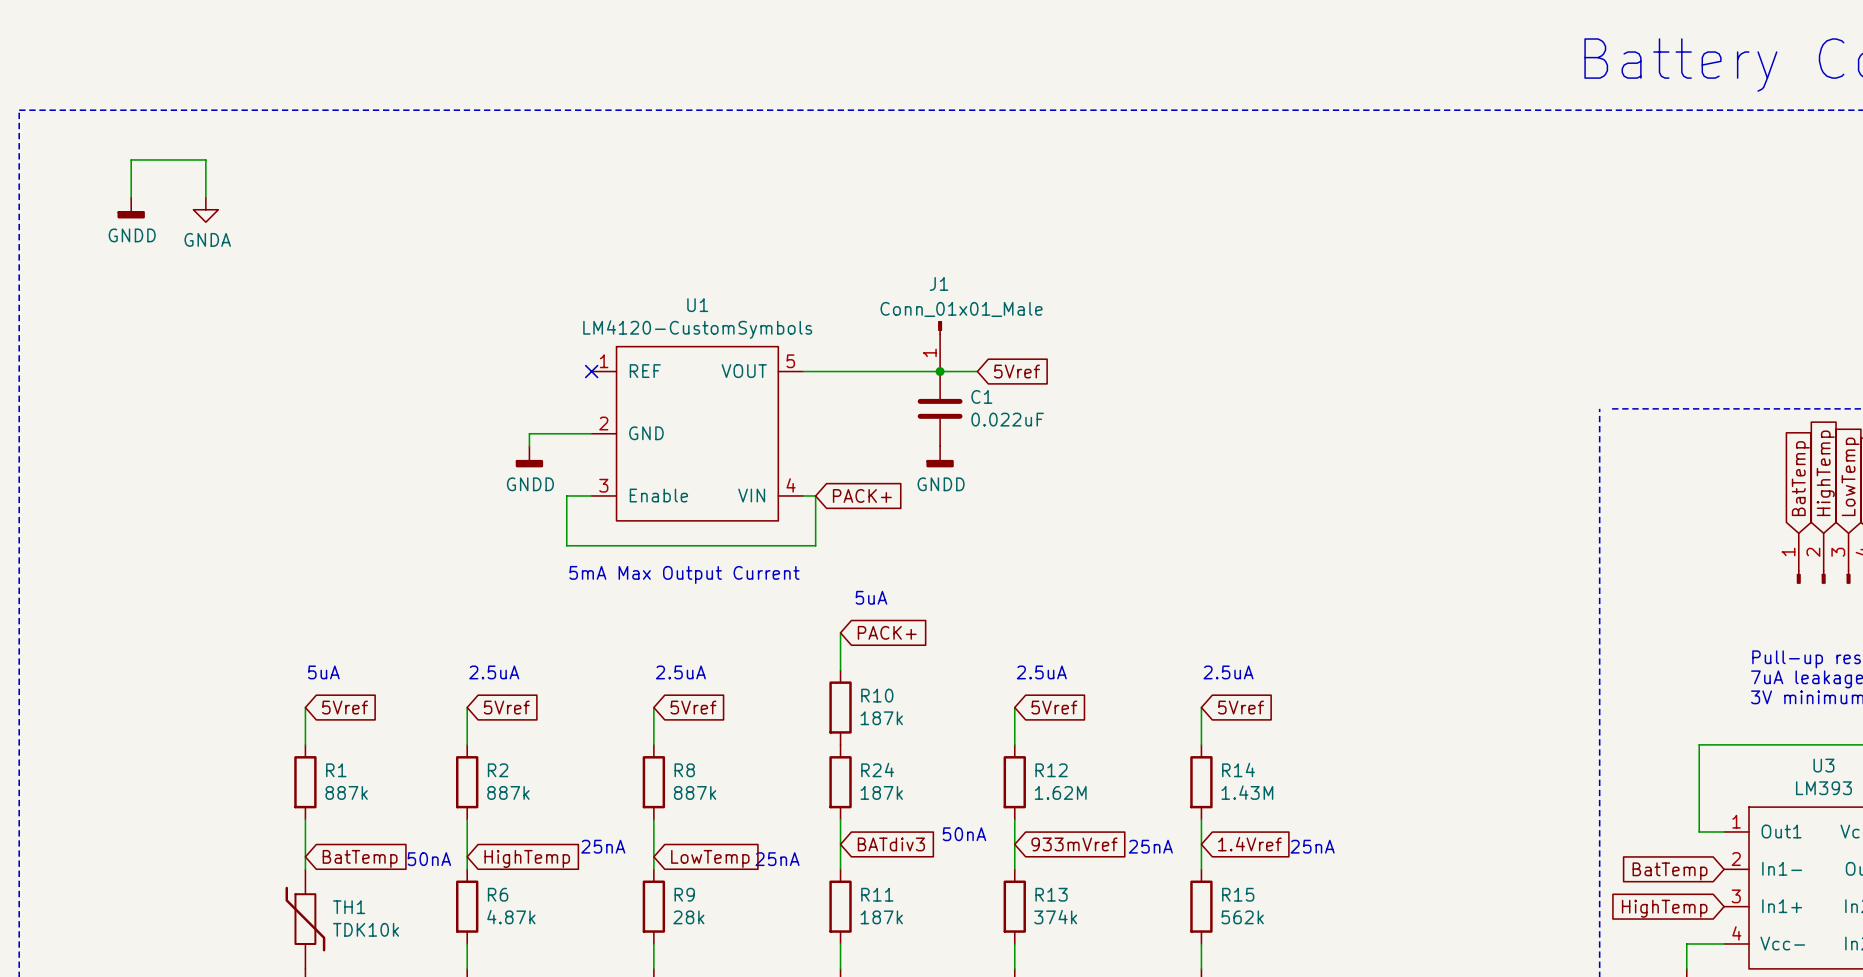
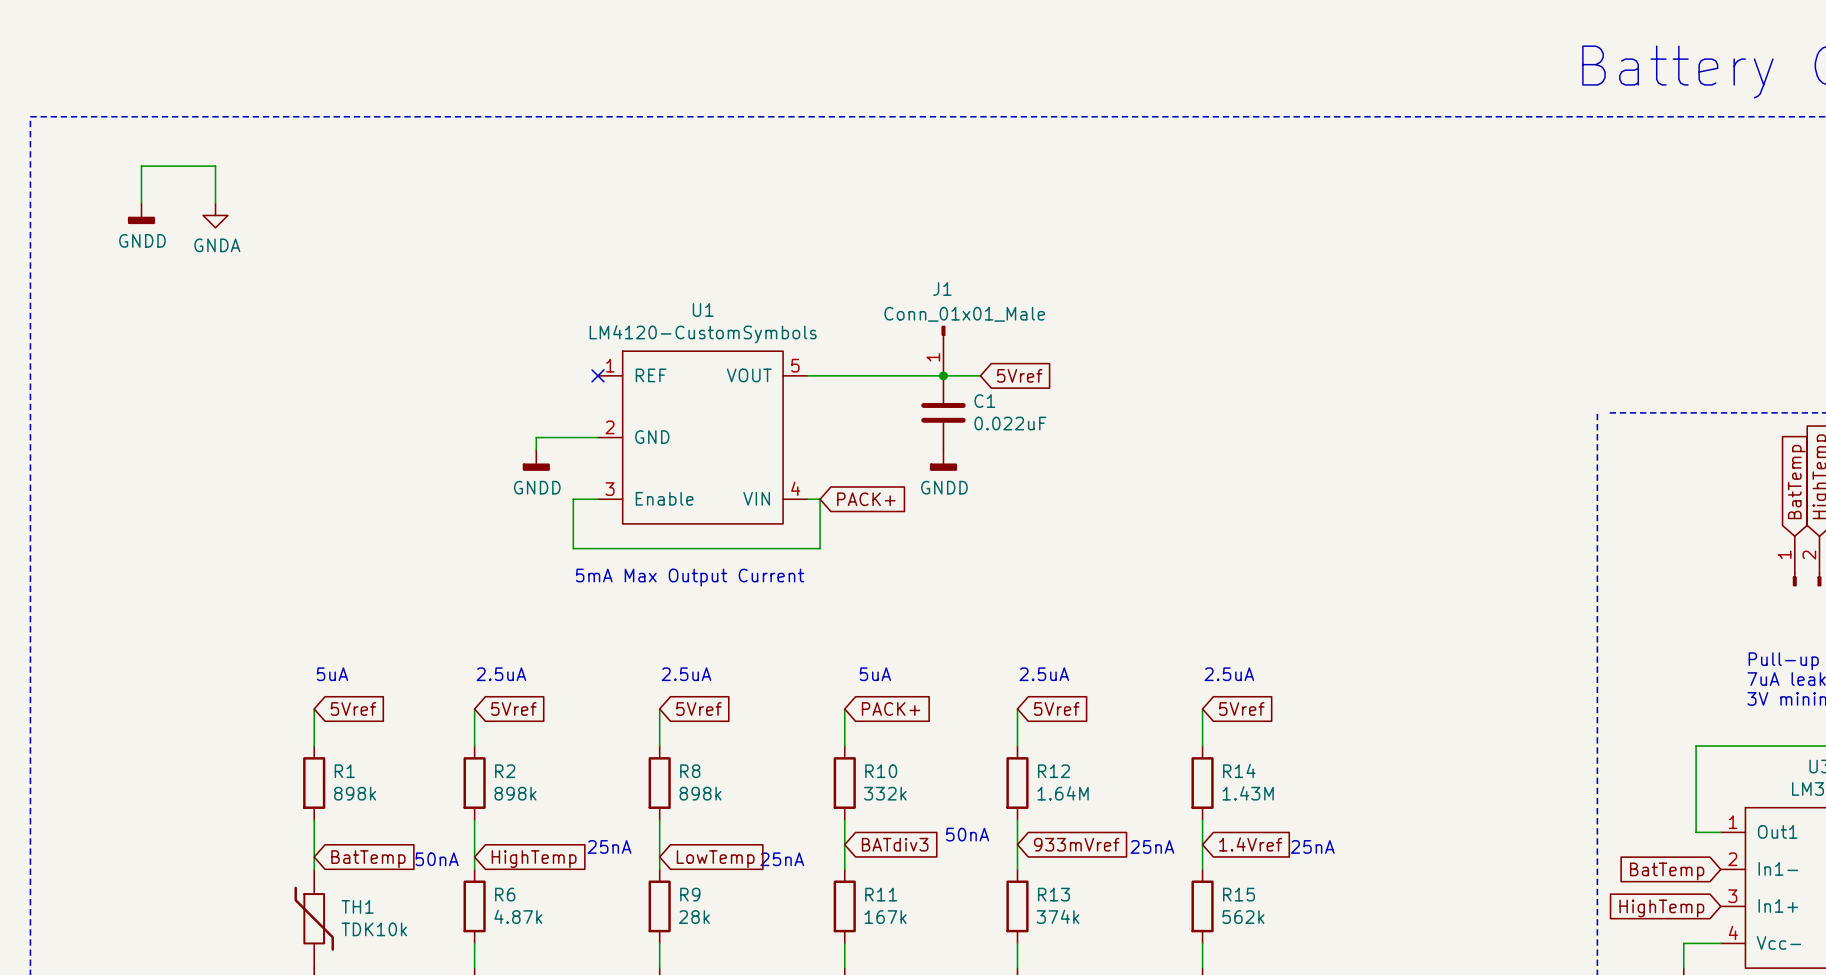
text position: 5uA (871, 597) -> 5uA (875, 674)
wire: (840, 632) (840, 670) -> (844, 709) (844, 746)
global label position: PACK+ (887, 632) -> PACK+ (891, 709)
R10: 187k (840, 707) -> none
R24 name: R24 (877, 770) -> R10 (881, 771)
R1 value: 887k (346, 792) -> 898k (355, 793)
R2 value: 887k (508, 792) -> 898k (515, 793)
R8 value: 887k (695, 792) -> 898k (700, 793)
R24 value: 187k (881, 792) -> 332k (885, 793)
R12 value: 1.62M (1060, 792) -> 1.64M (1063, 793)
R11 value: 187k (881, 917) -> 167k (885, 917)

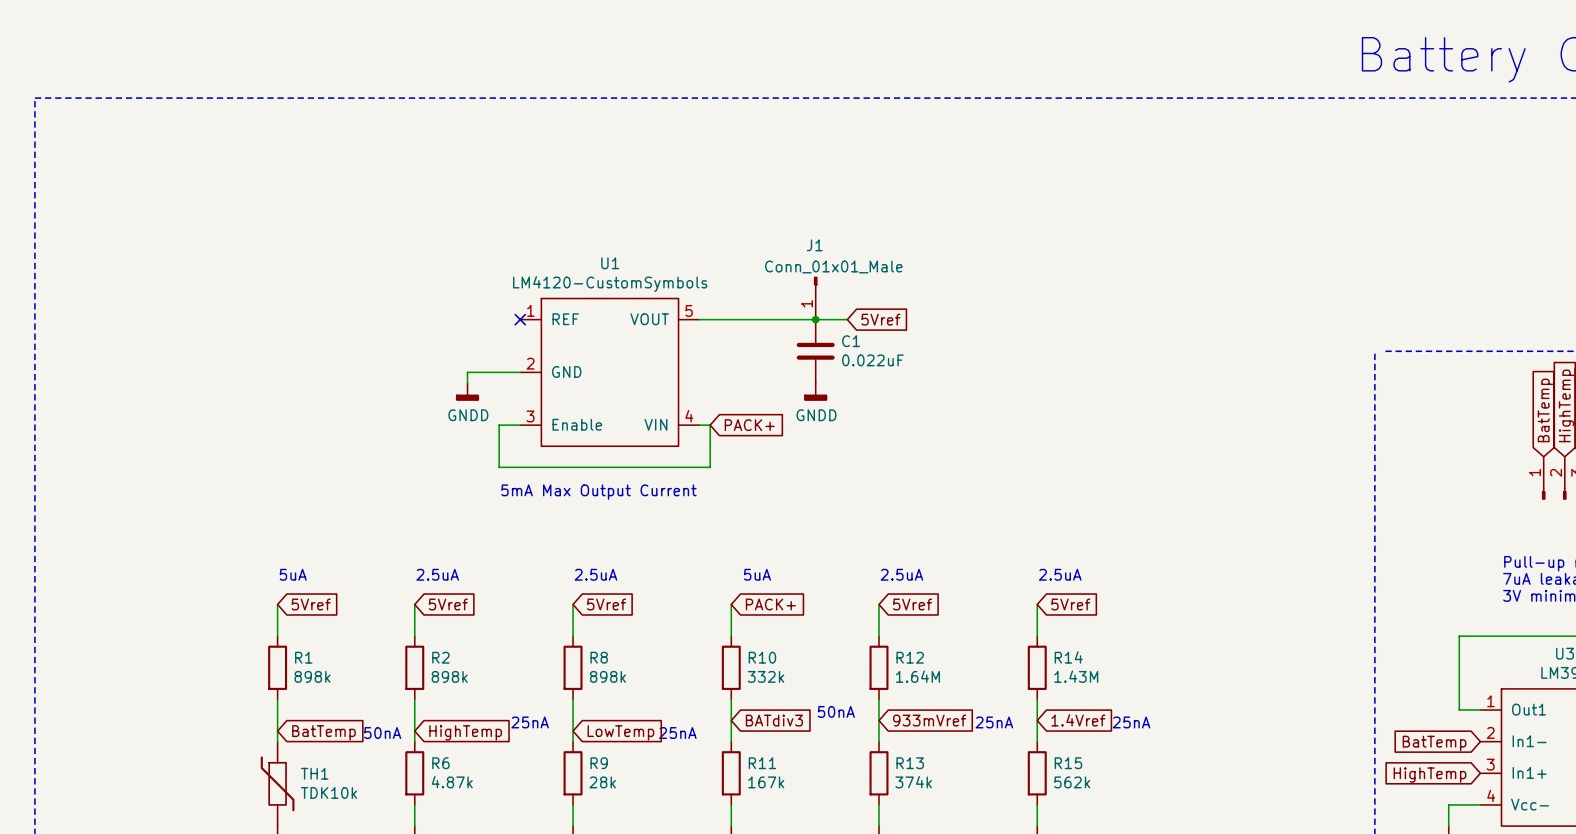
wire: (141, 203) (141, 166) (215, 166) (215, 203) -> none
power symbol: GNDD (141, 213) -> none
power symbol: GNDA (215, 215) -> none

